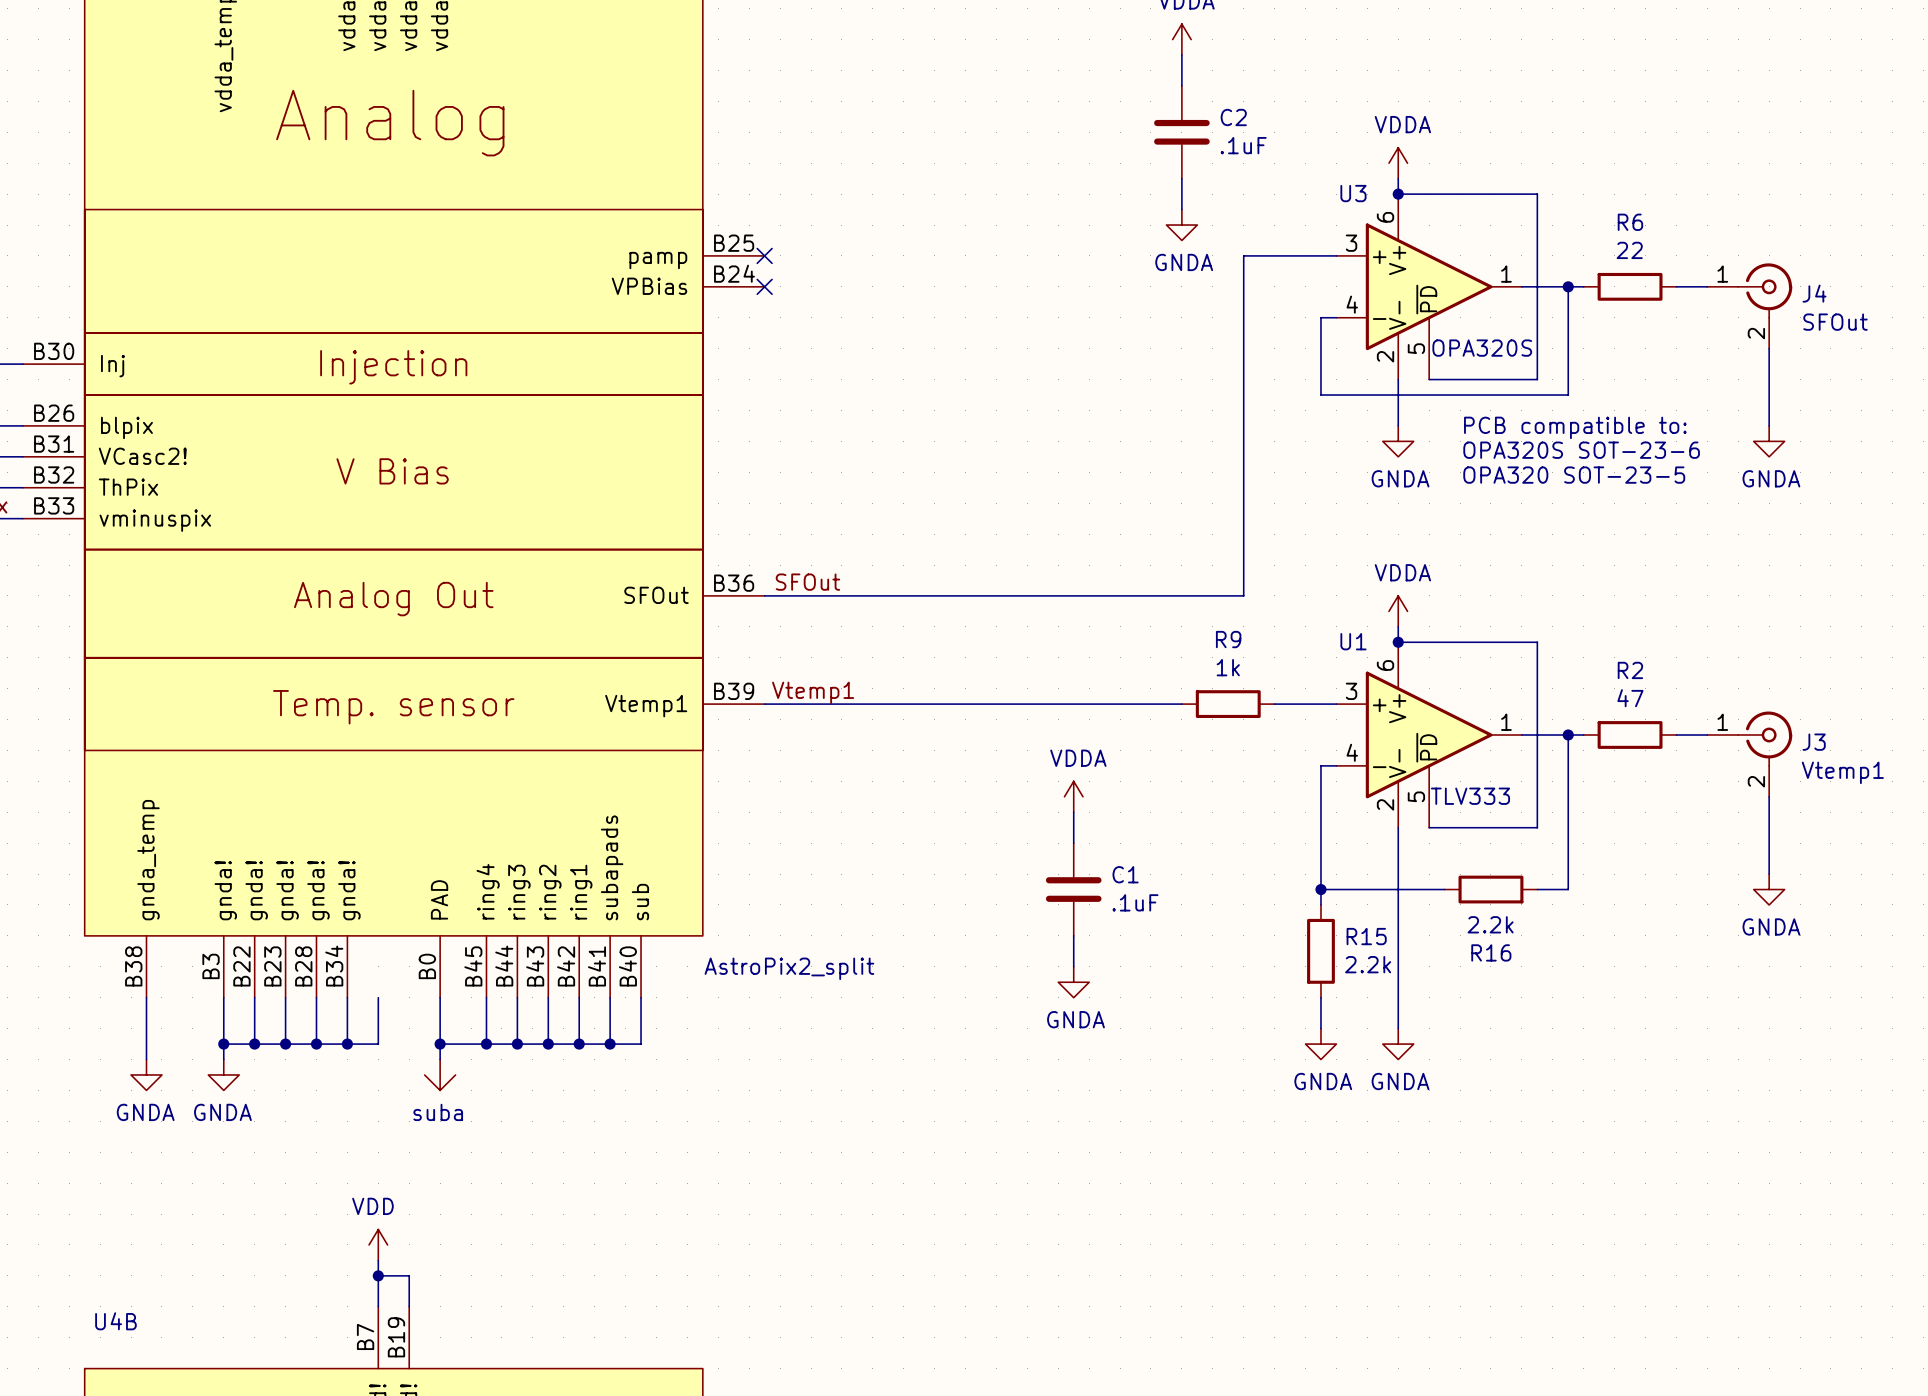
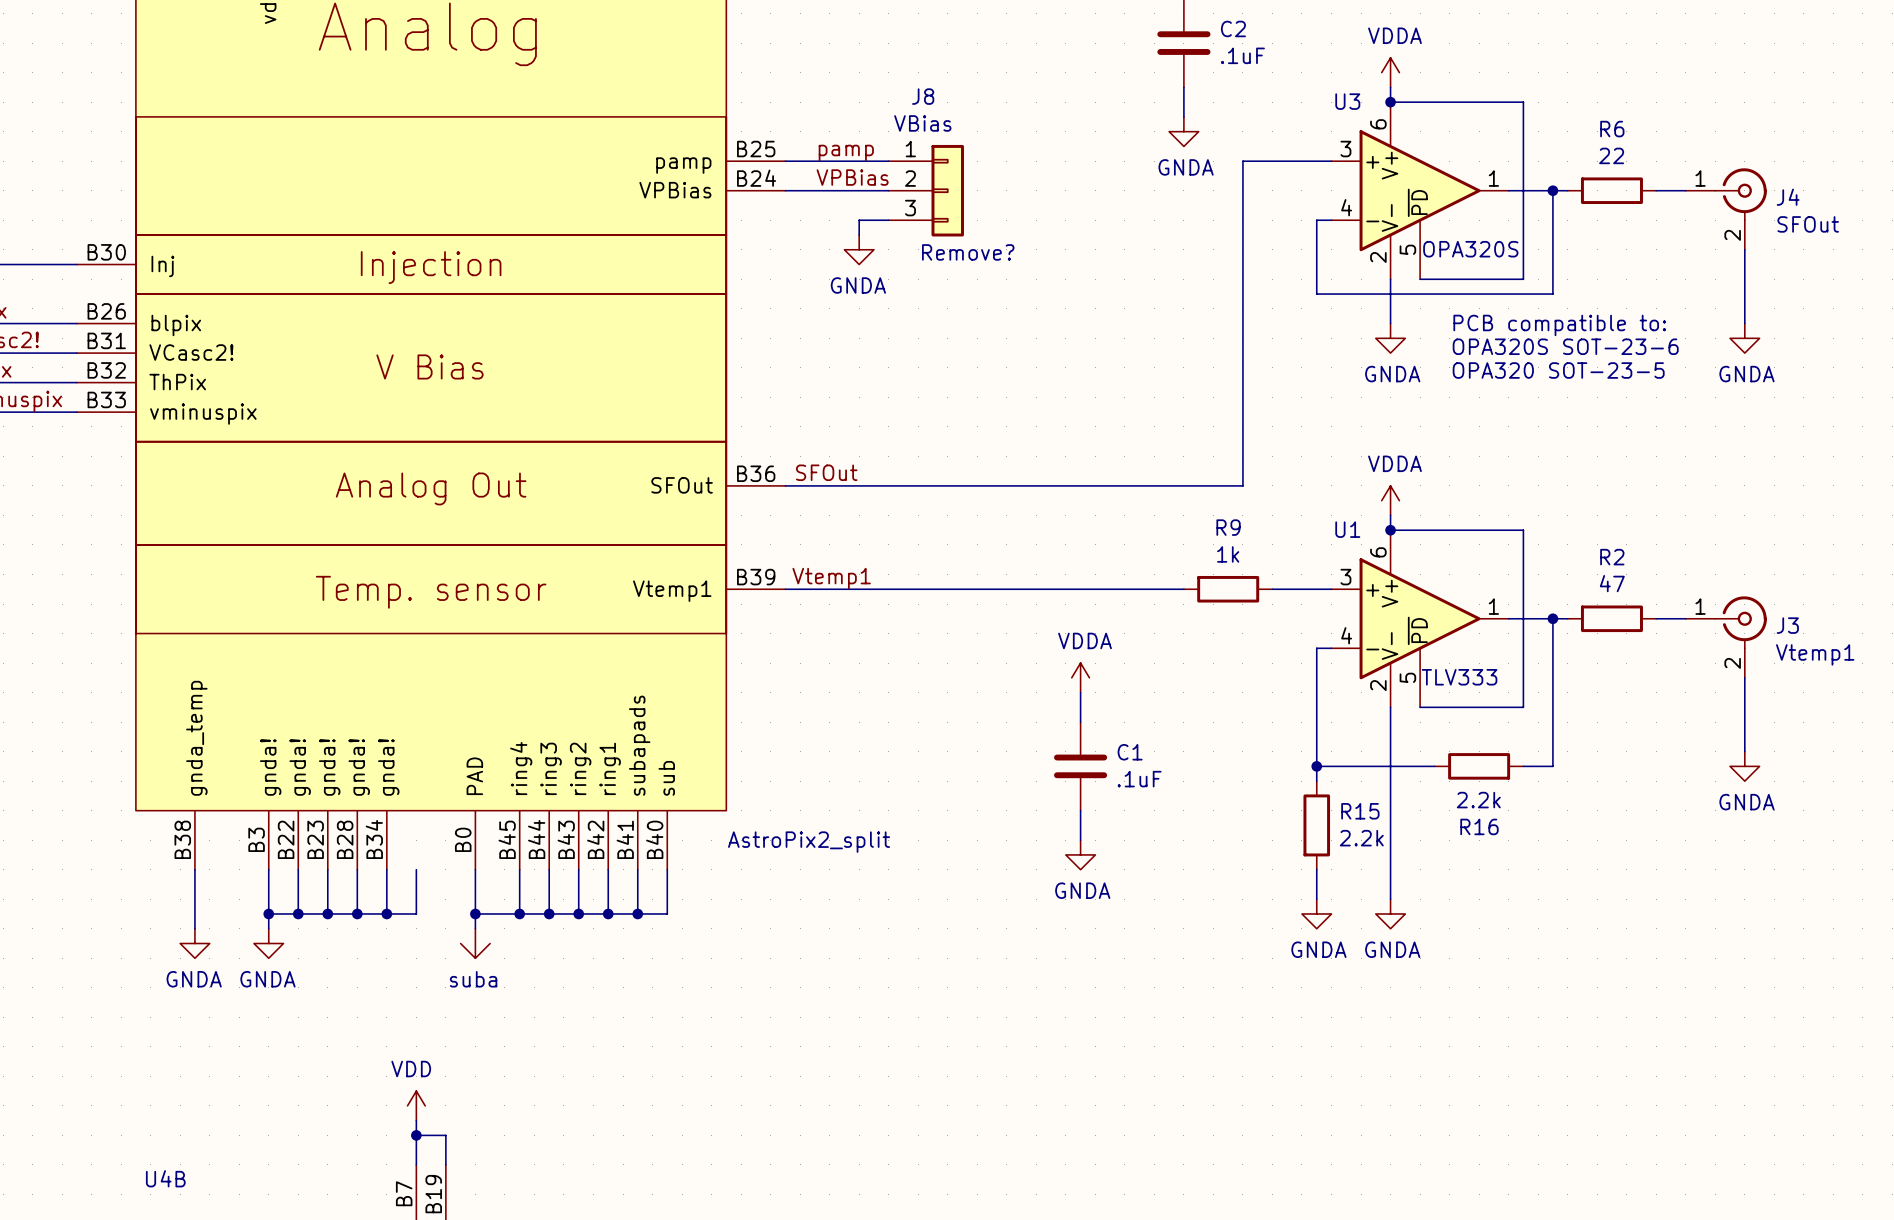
label: none -> pamp (846, 152)
wire: none -> (785, 161) (888, 161)
no-connect mark: (764, 255) -> none
label: none -> VPBias (852, 177)
wire: none -> (785, 190) (888, 190)
no-connect mark: (764, 286) -> none
J8: none -> VBias (926, 190)
wire: none -> (888, 220) (859, 220) (859, 235)
power symbol: none -> GNDA (859, 249)
text: none -> Remove? (968, 252)

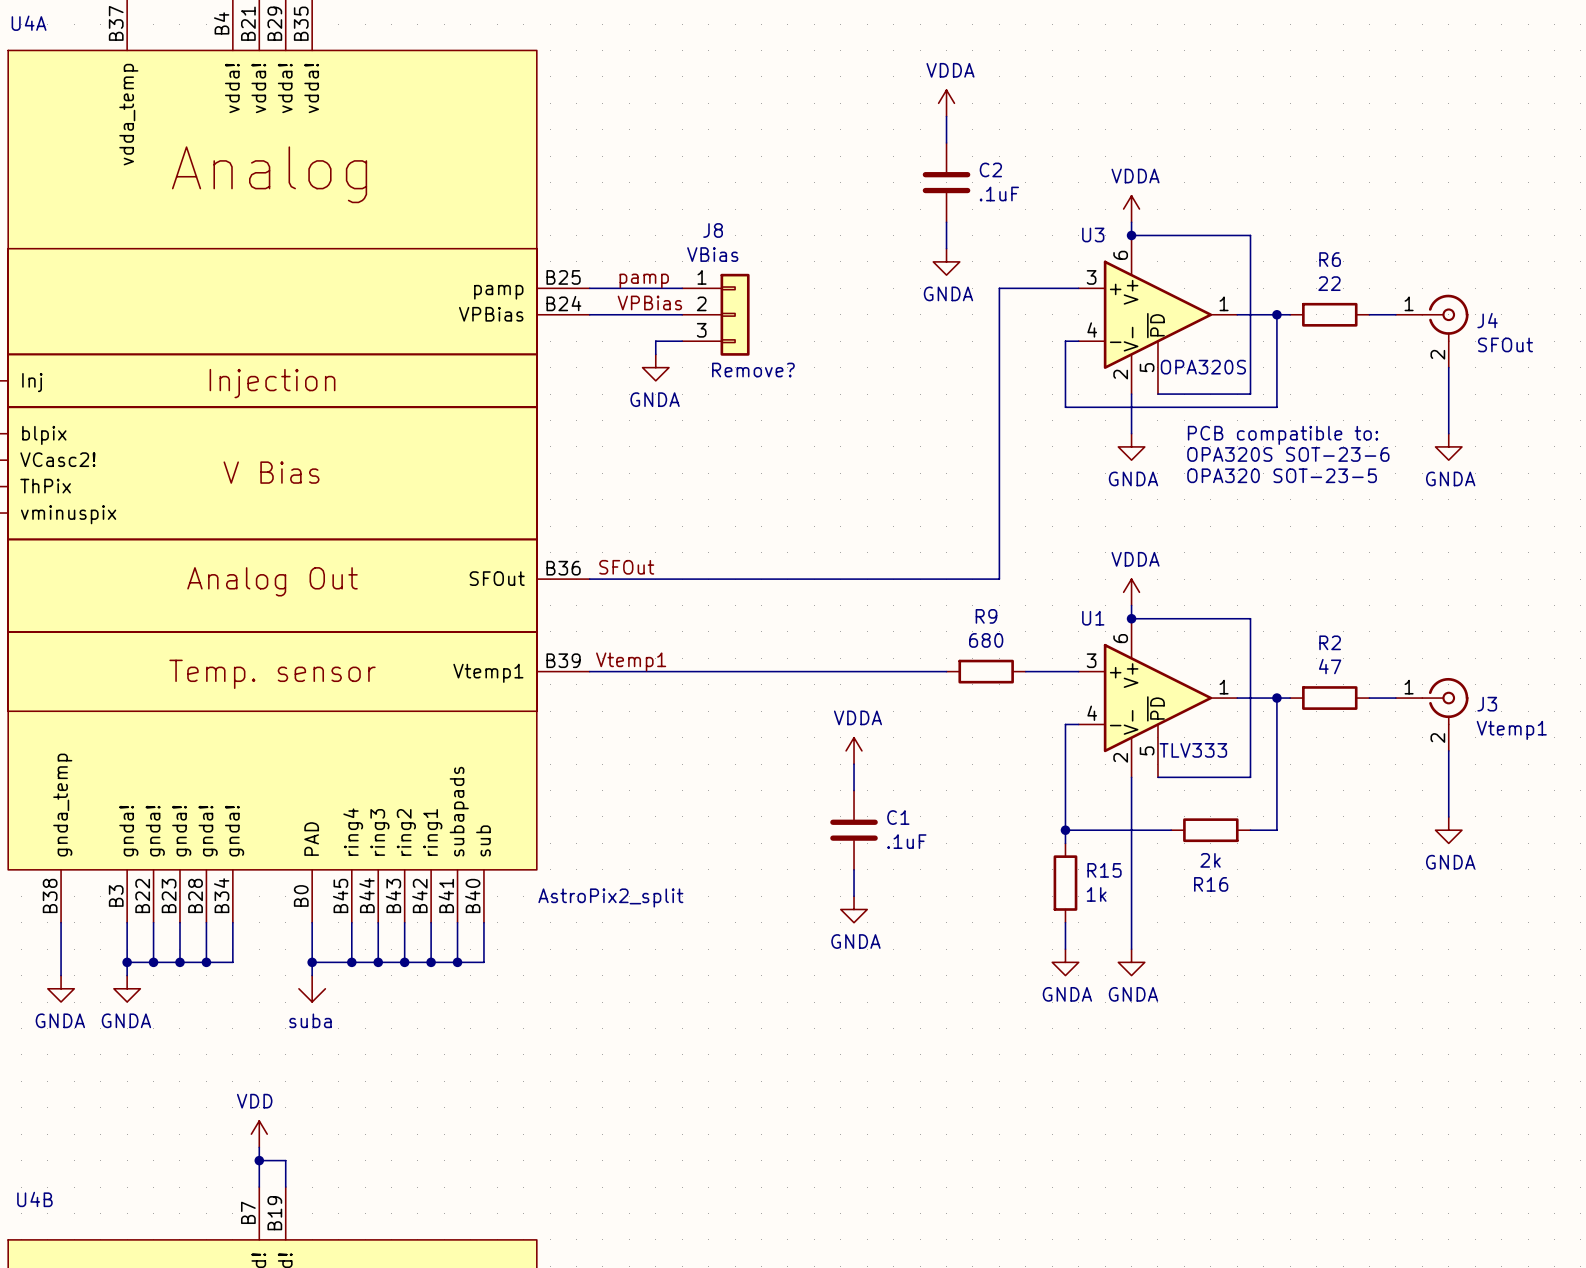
R9 value: 1k (1228, 554) -> 680 (986, 640)
R16 value: 2.2k (1478, 800) -> 2k (1210, 860)
R15 value: 2.2k (1361, 838) -> 1k (1096, 894)
wire: (416, 869) (416, 913) (386, 913) -> none
junction: (386, 913) -> none

